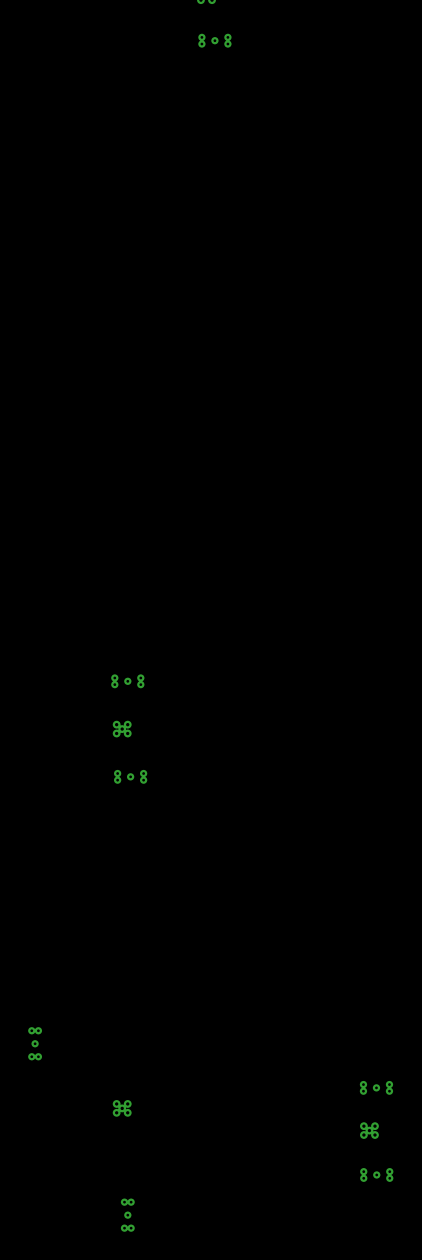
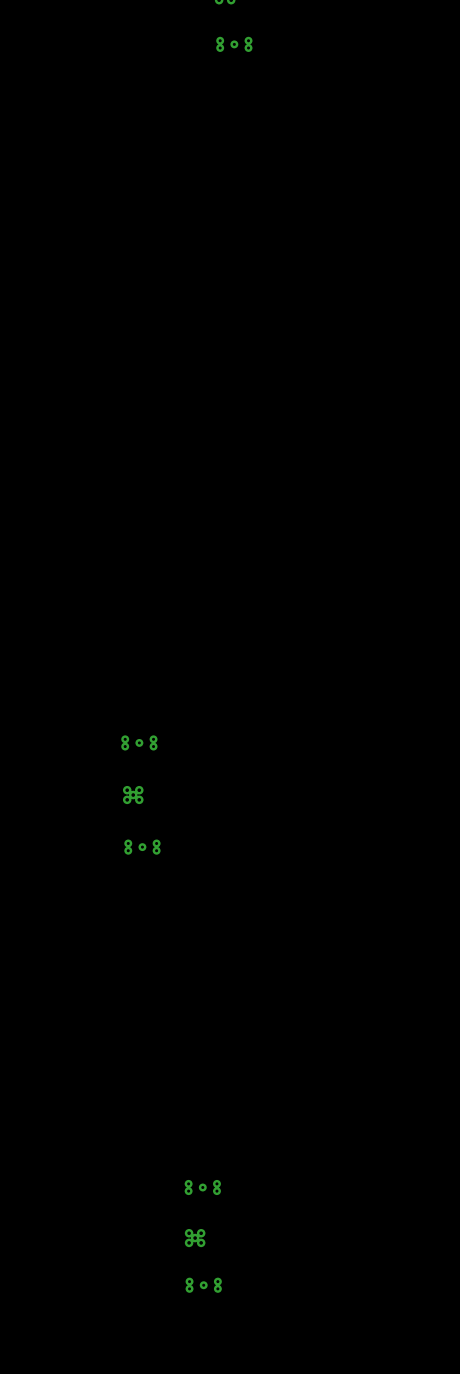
part: (35, 1043) -> none
part: (376, 1087) -> none
part: none -> (202, 1187)
part position: (122, 1108) -> (195, 1238)
part: (369, 1130) -> none
part: (376, 1174) -> none
part: none -> (203, 1285)
part: (127, 1215) -> none

